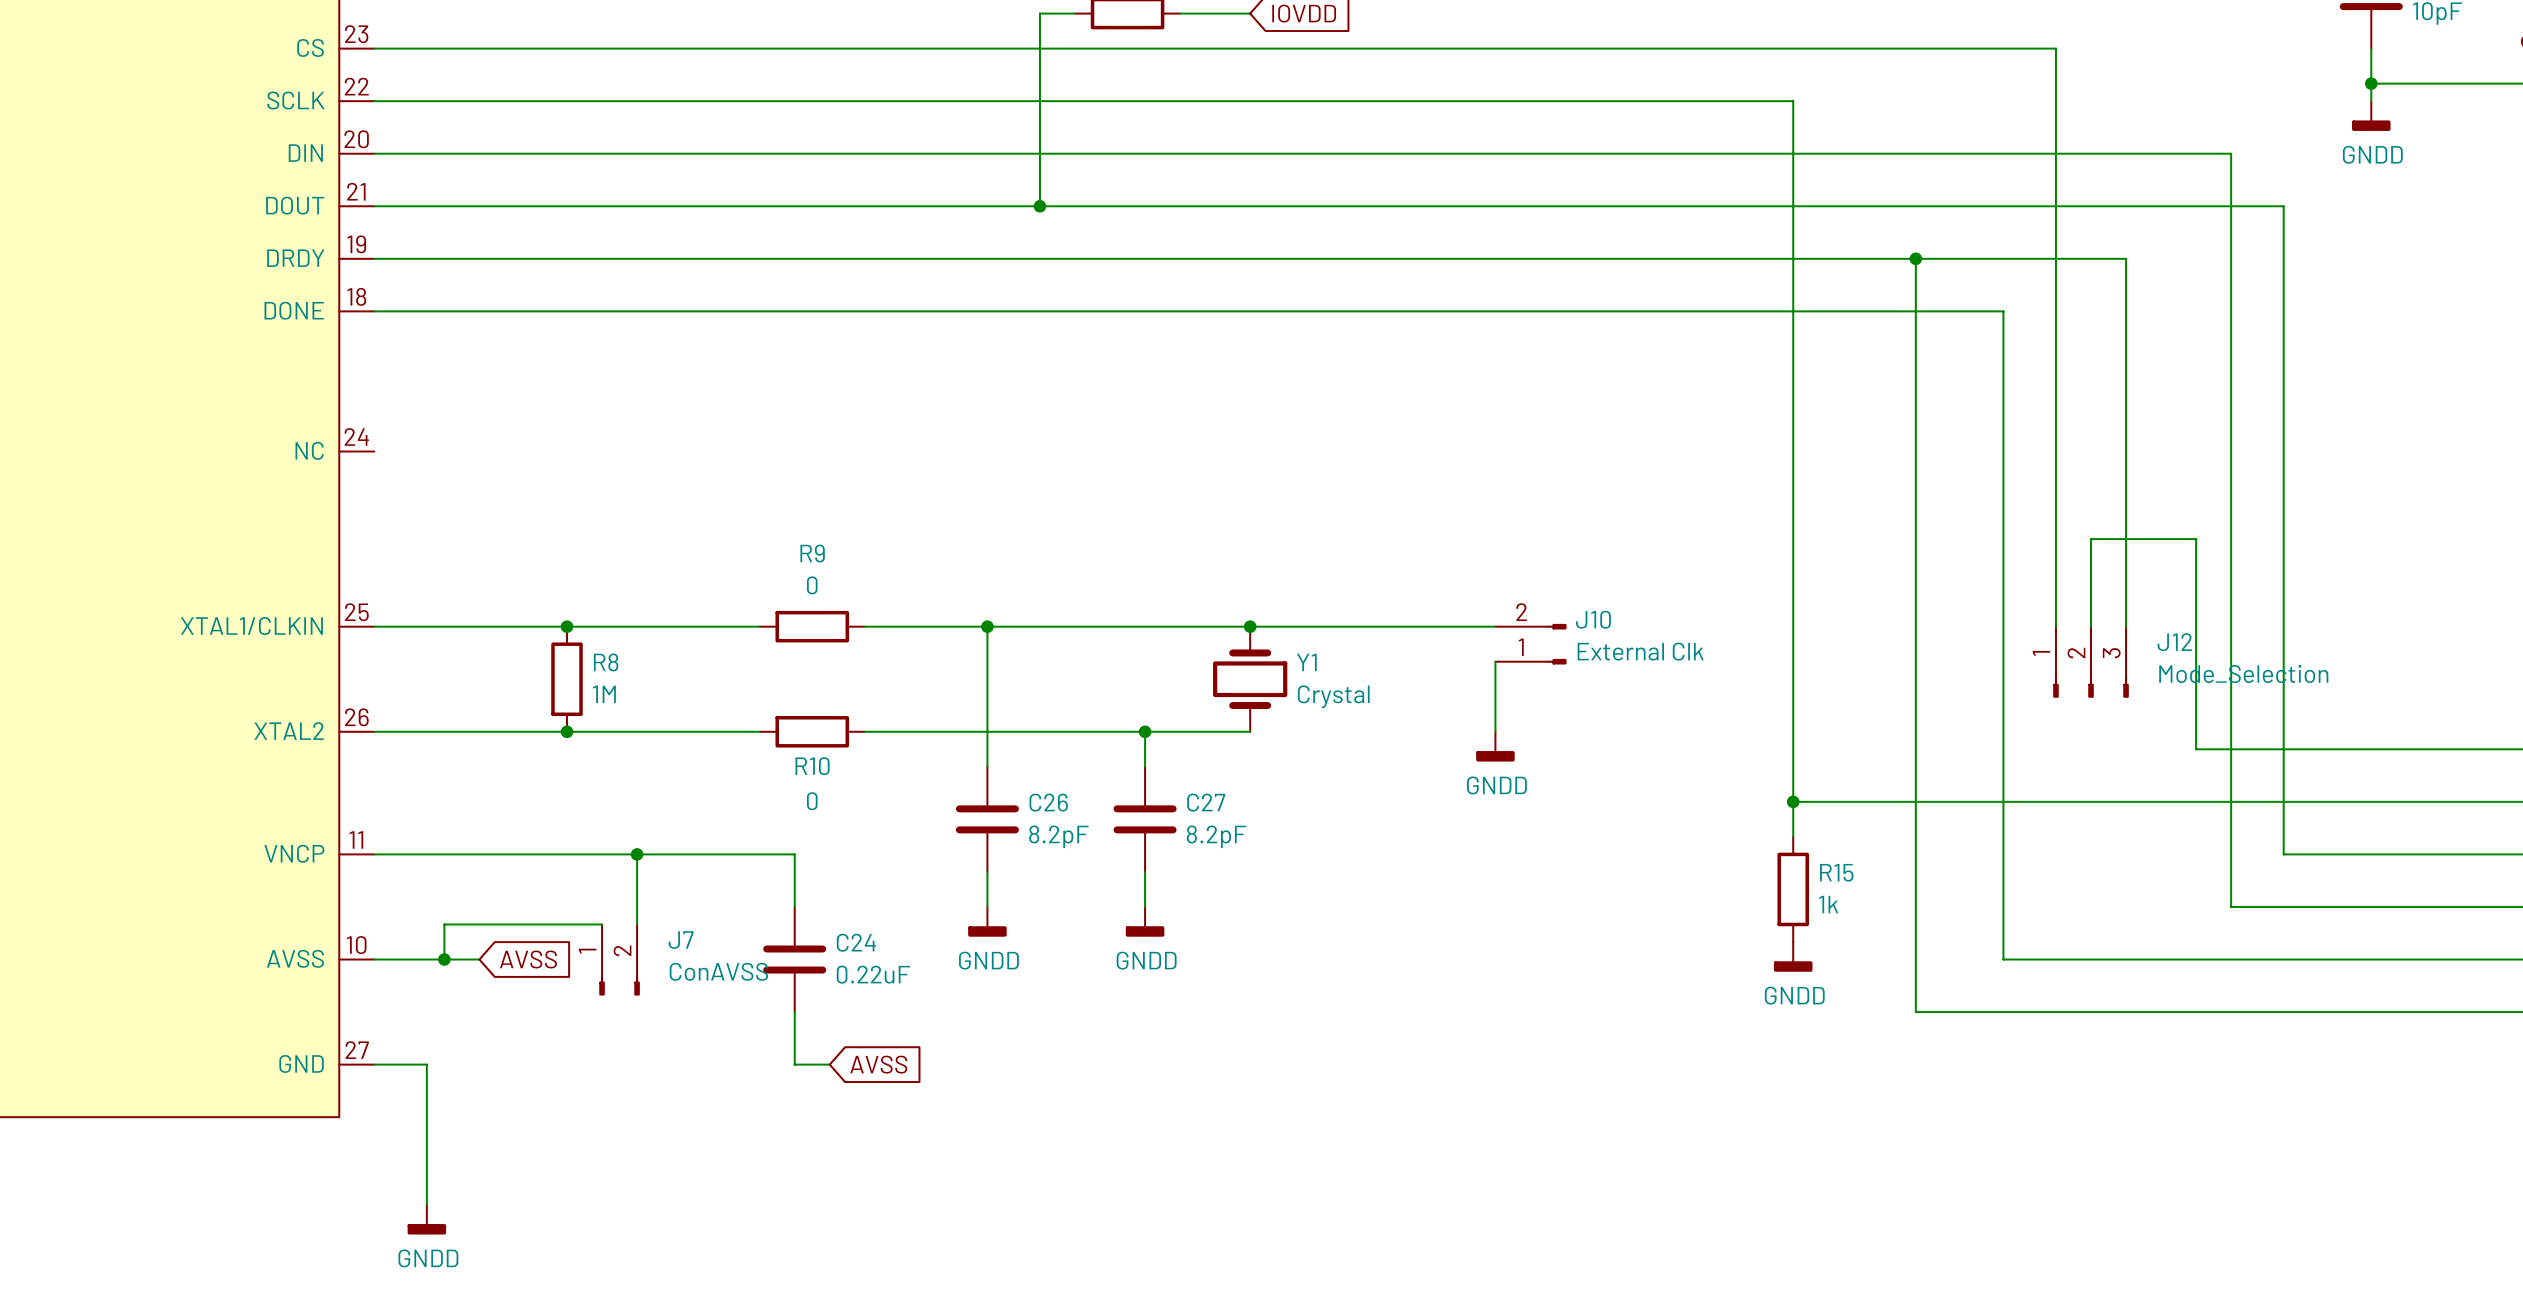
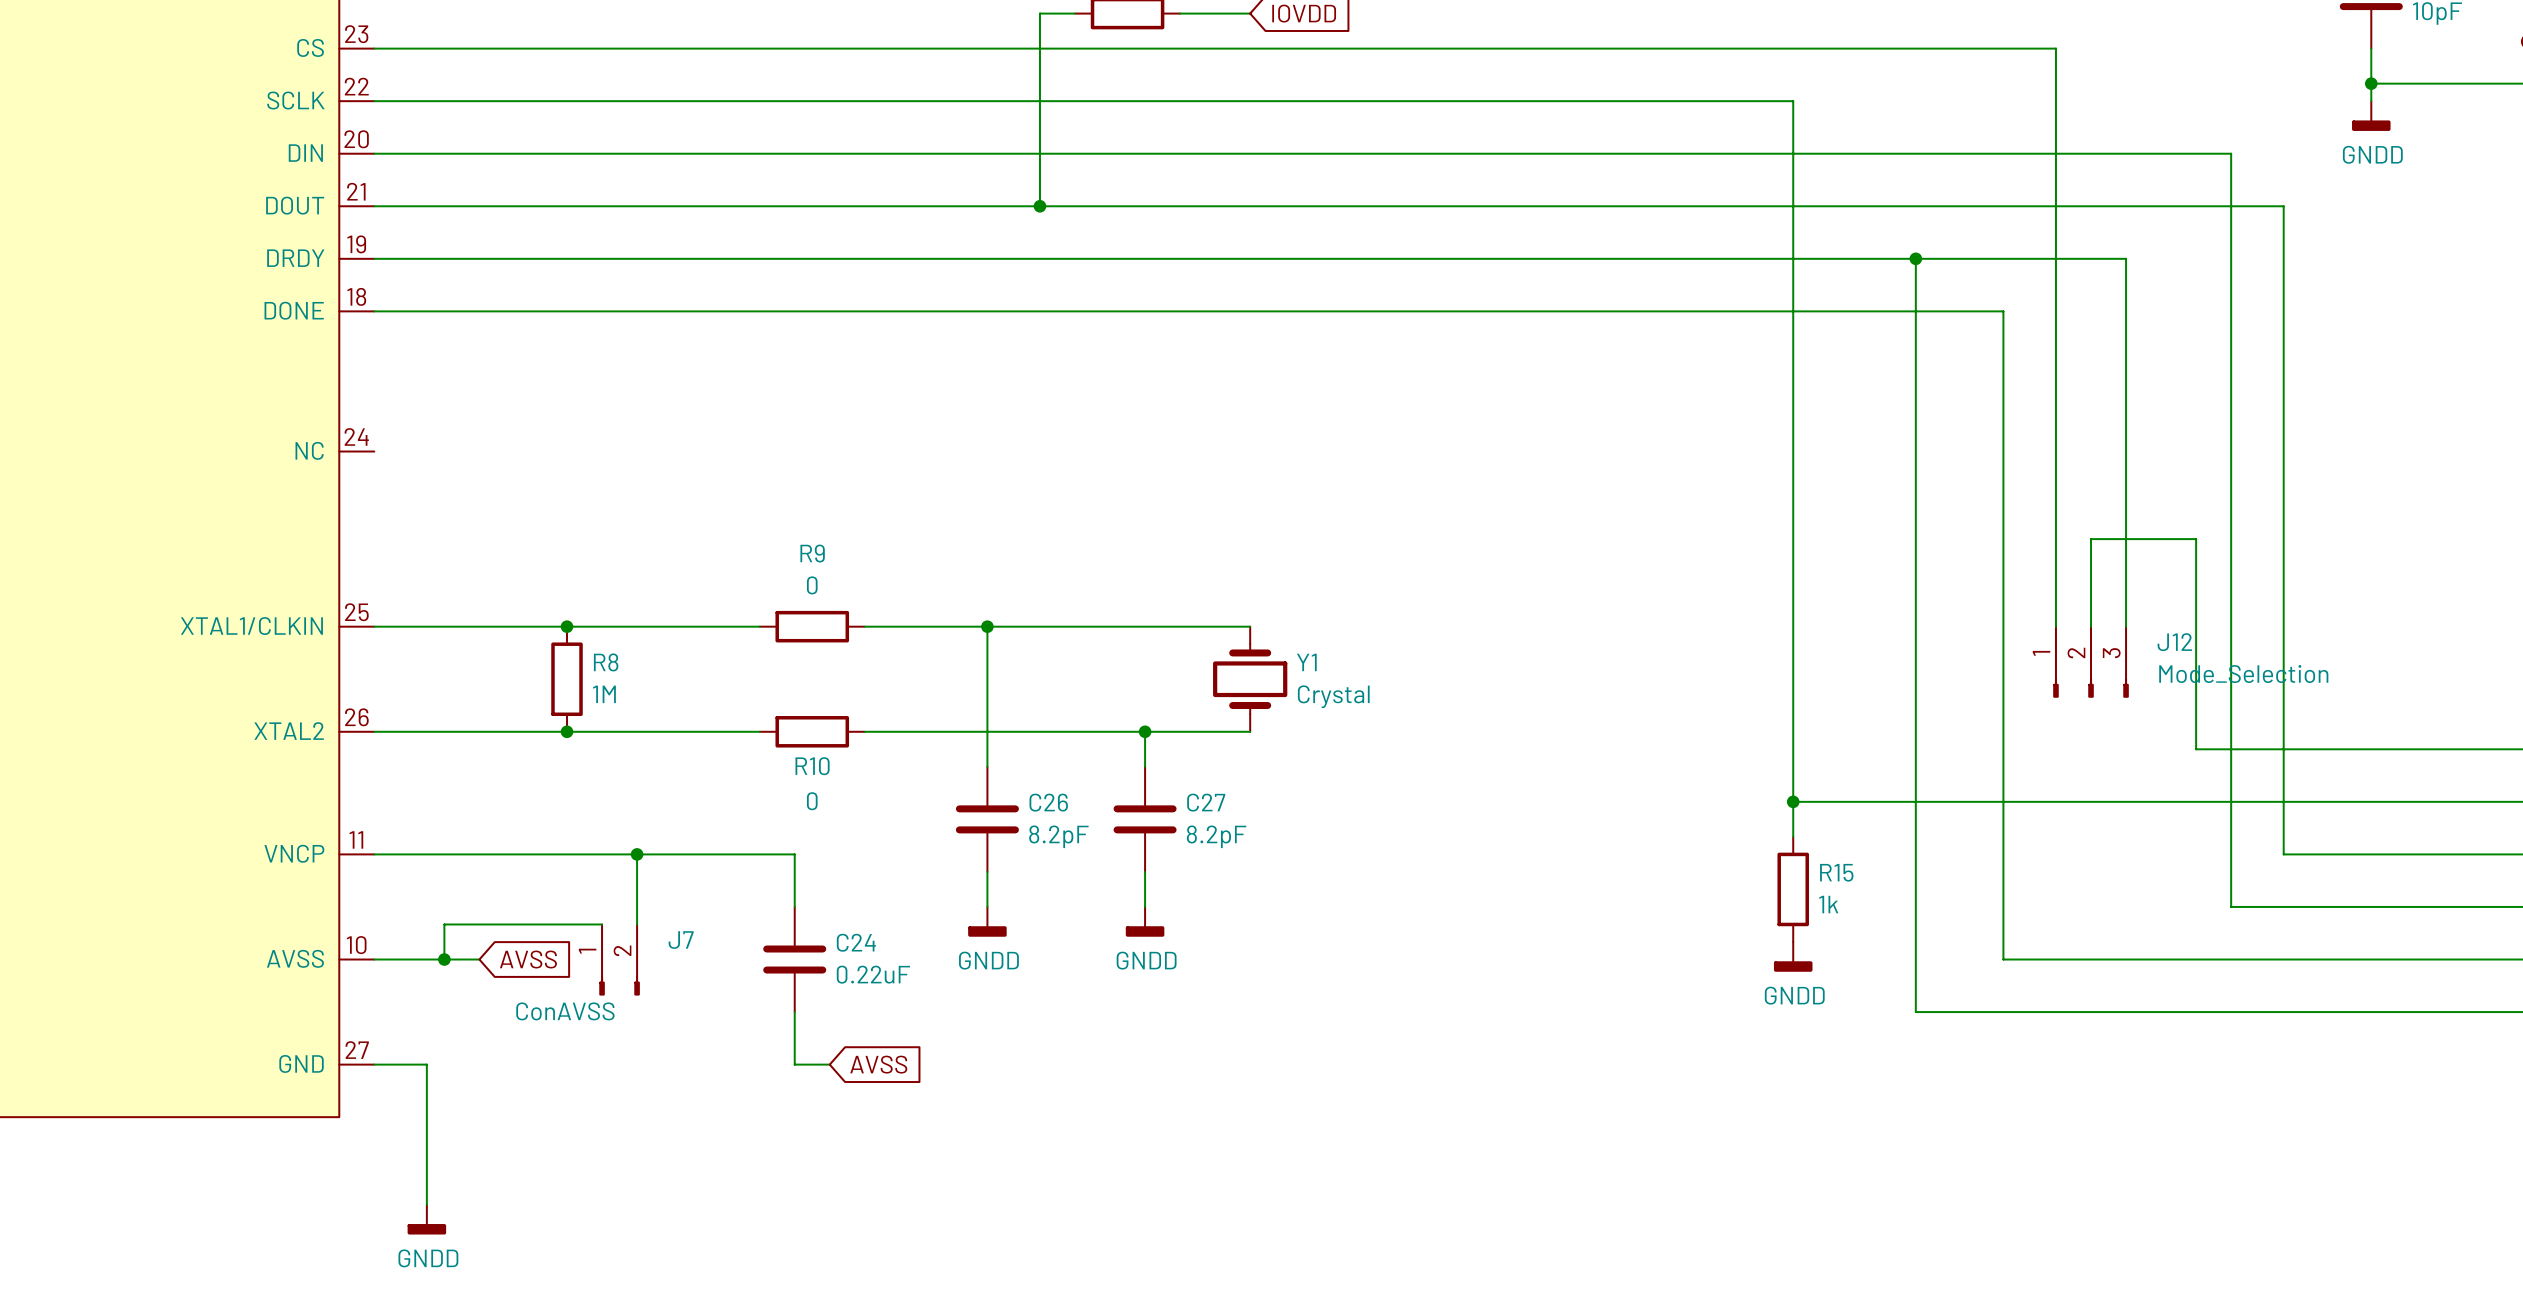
wire: (1250, 626) (1495, 626) -> none
junction: (1250, 626) -> none
J10: External Clk (1530, 644) -> none
wire: (1495, 661) (1495, 731) -> none
power symbol: GNDD (1495, 746) -> none
J7 value position: ConAVSS (718, 971) -> ConAVSS (565, 1011)

